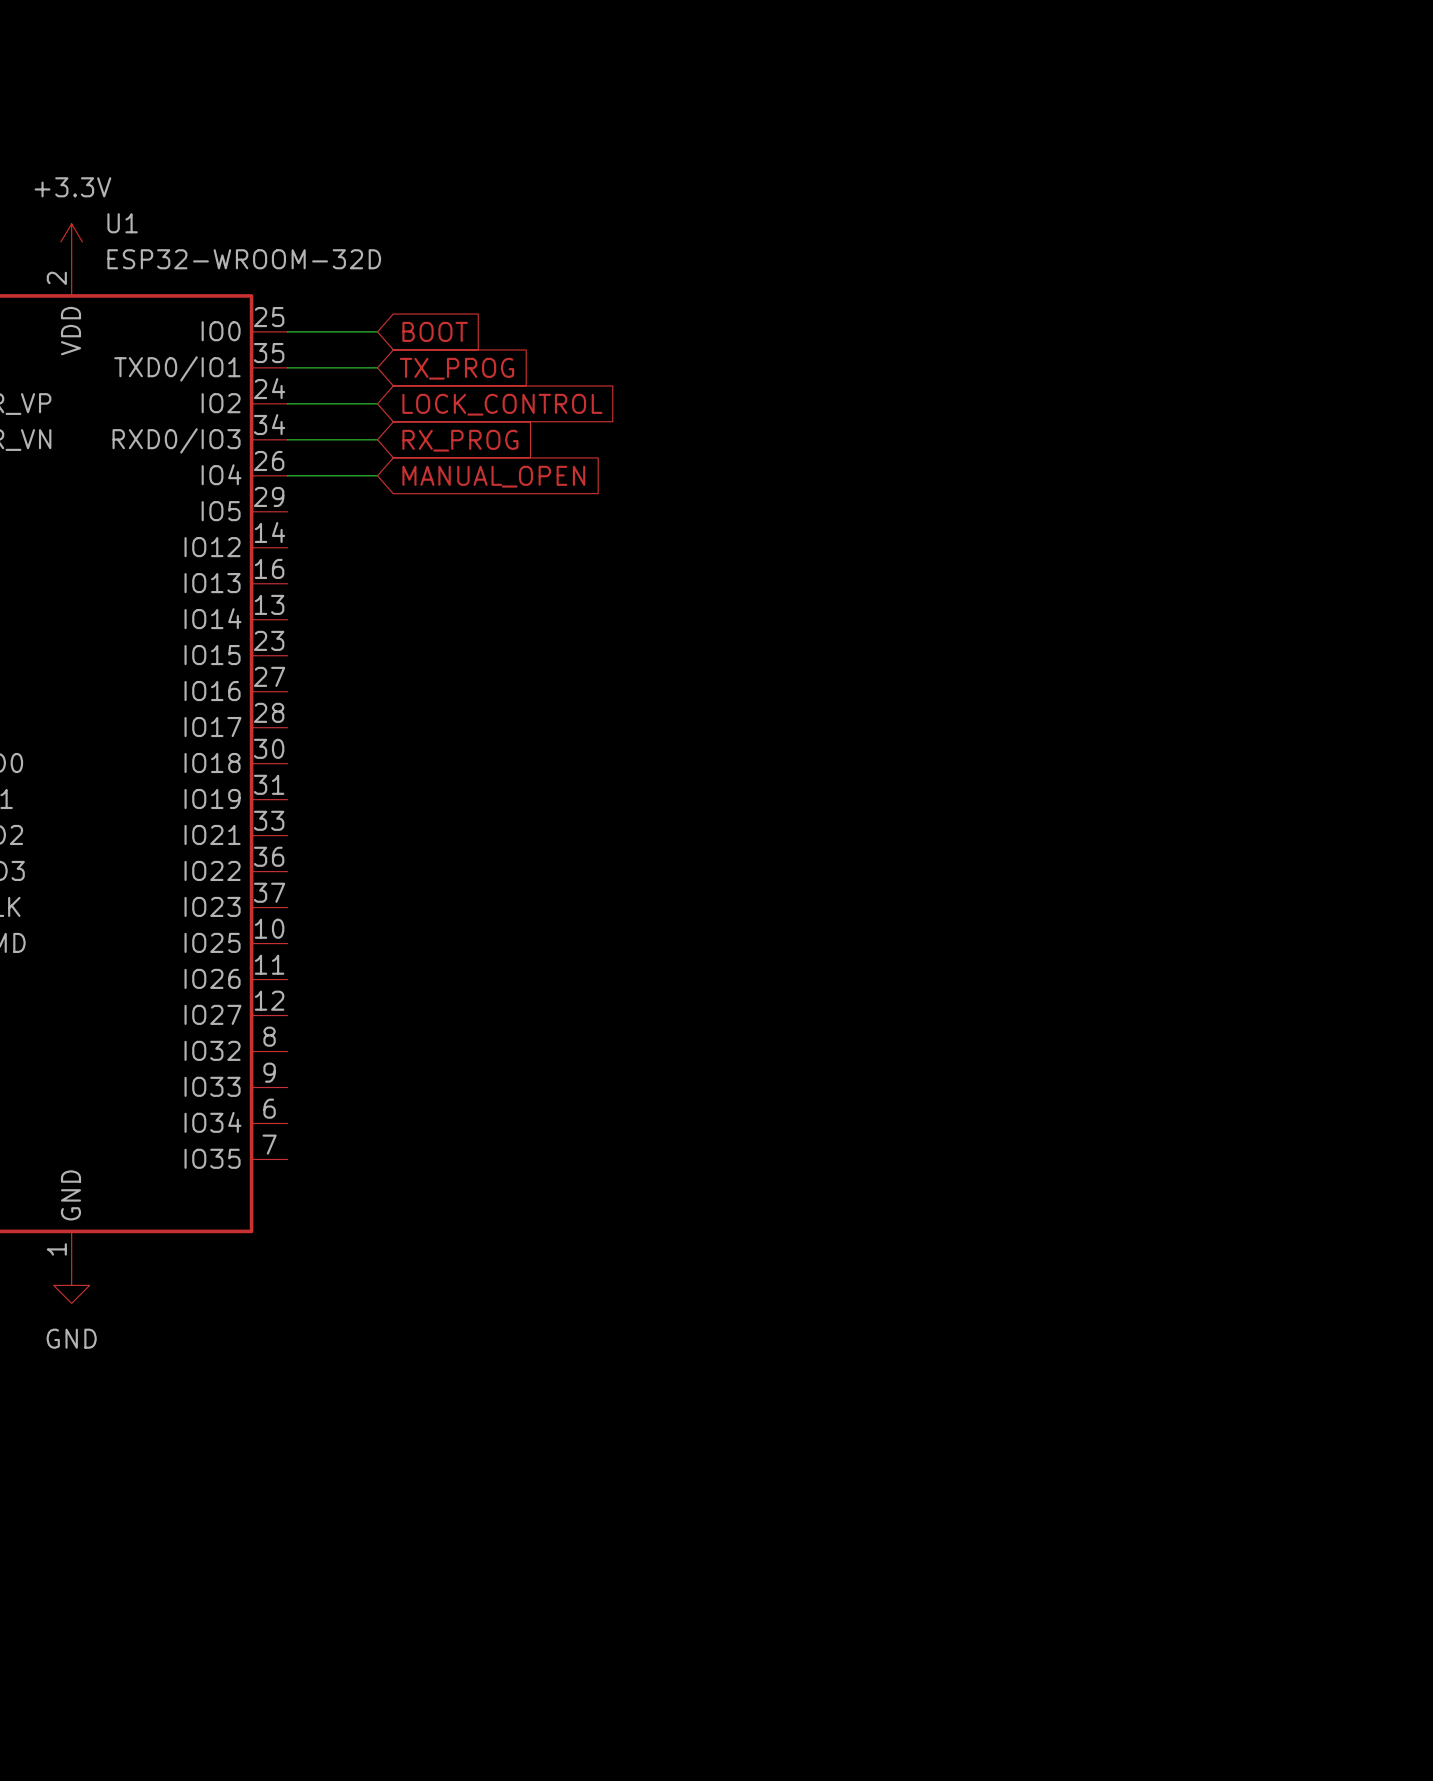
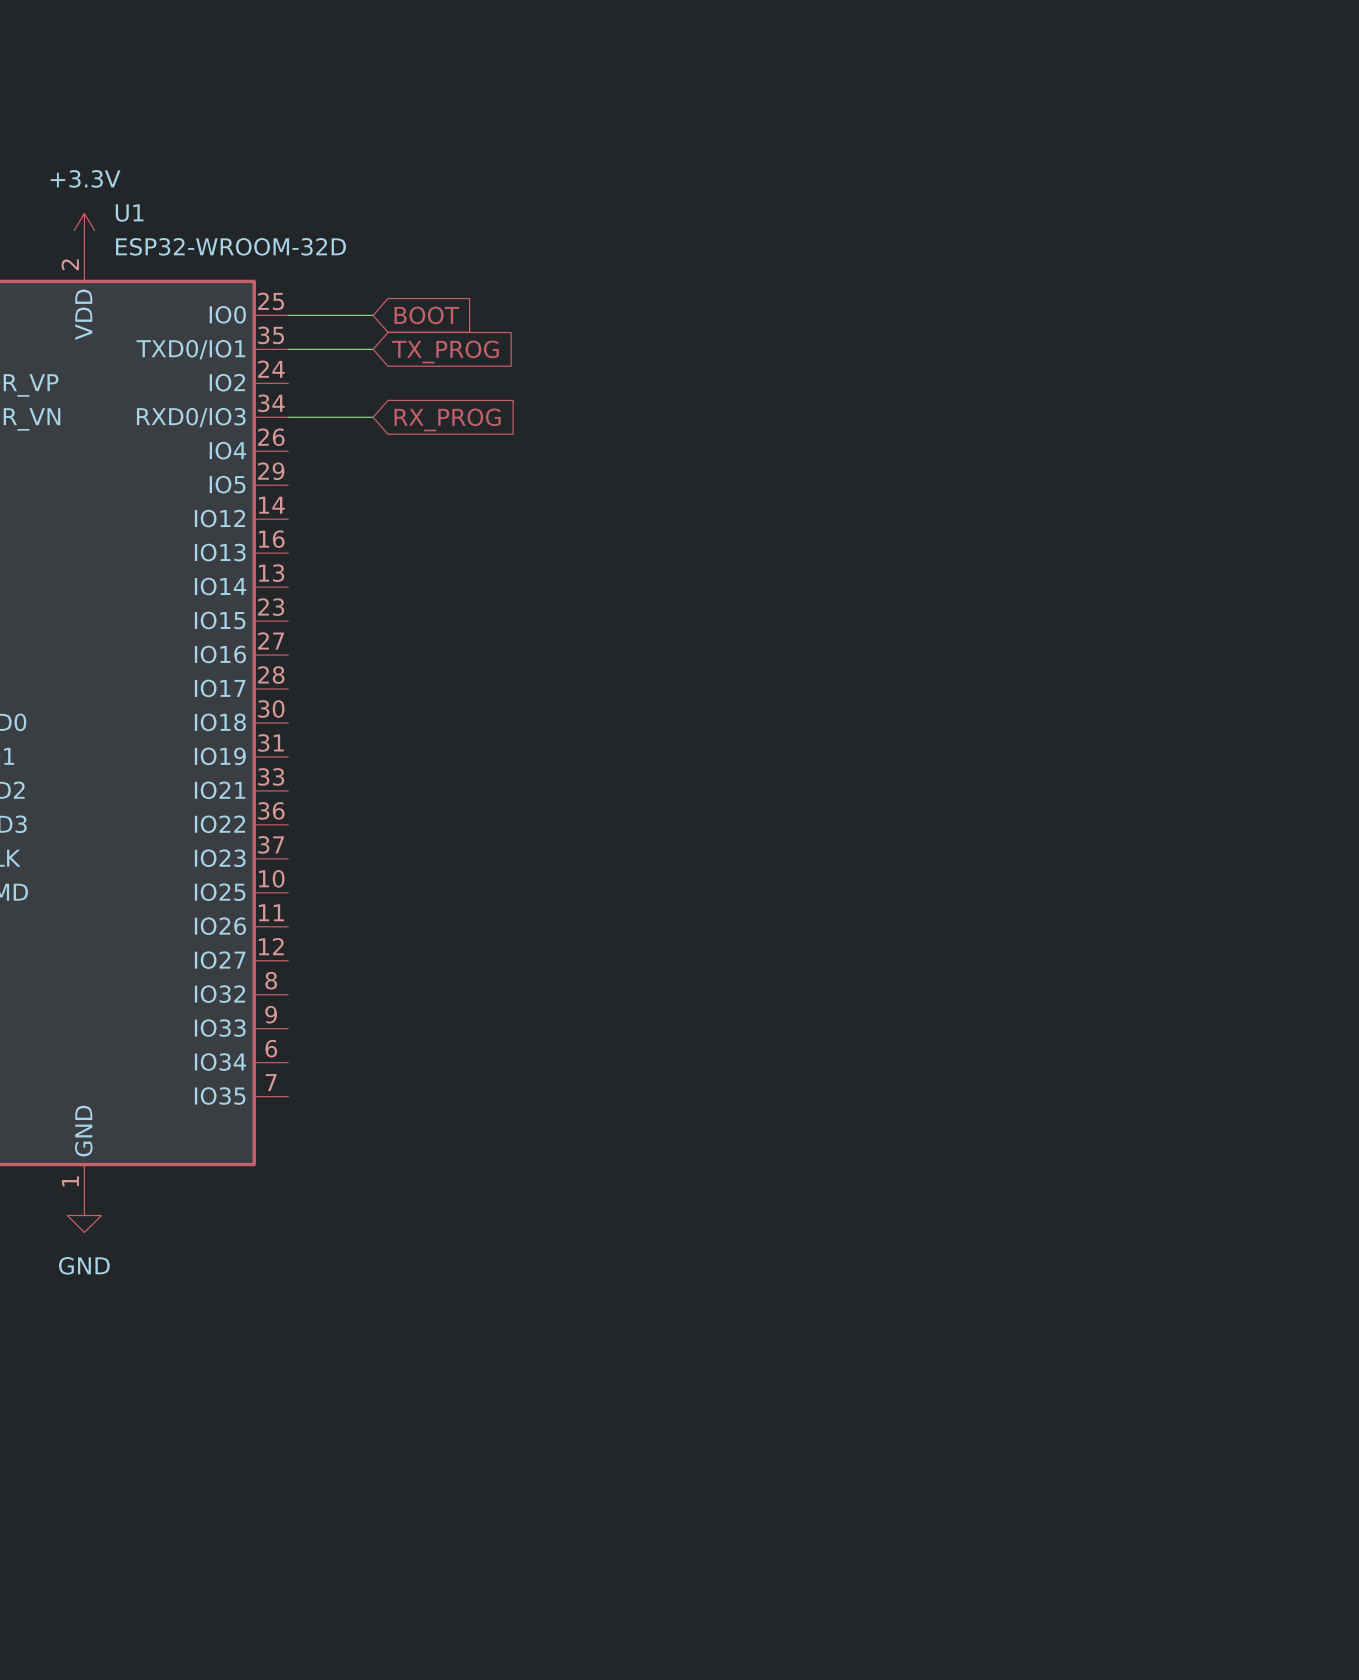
wire: (287, 403) (377, 403) -> none
global label: LOCK_CONTROL (502, 404) -> none
wire: (287, 475) (377, 475) -> none
global label: MANUAL_OPEN (493, 476) -> none

